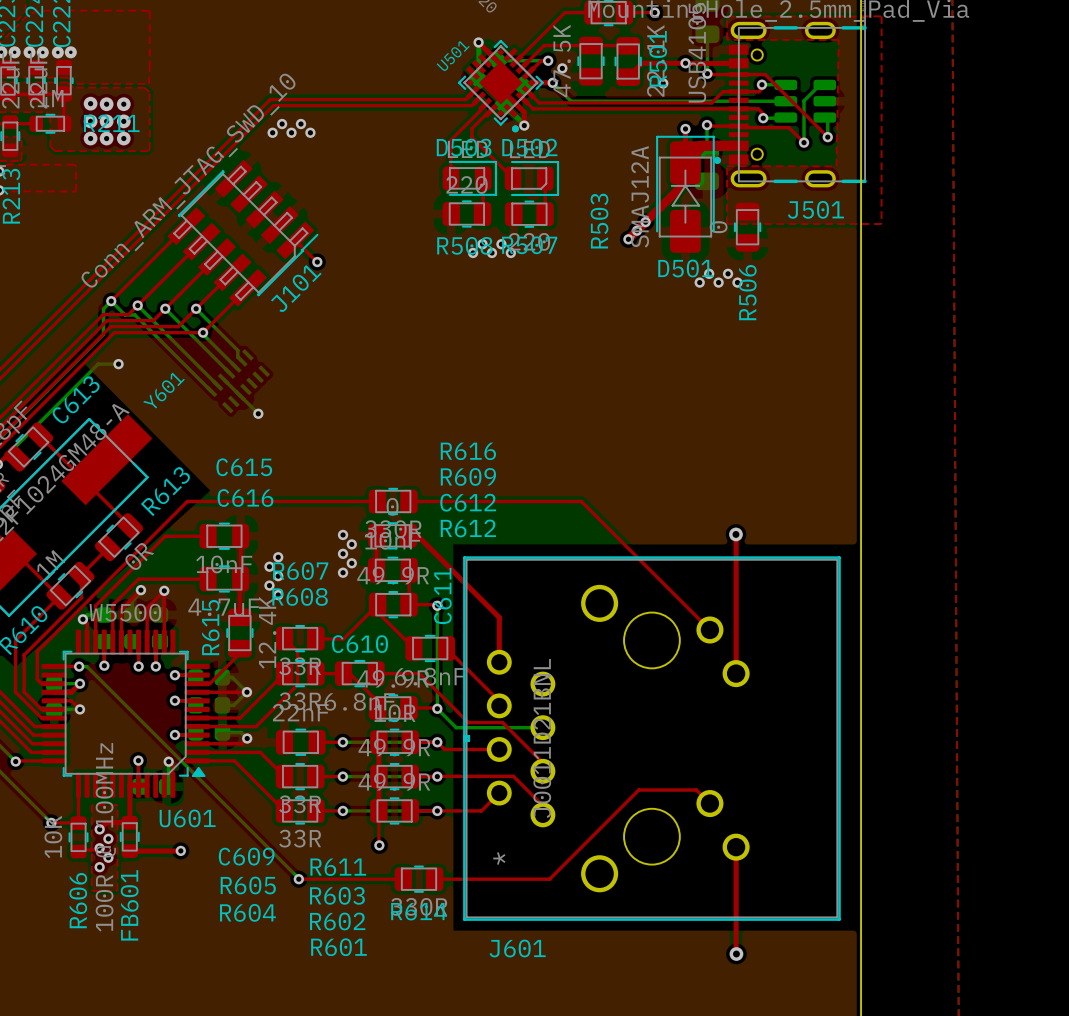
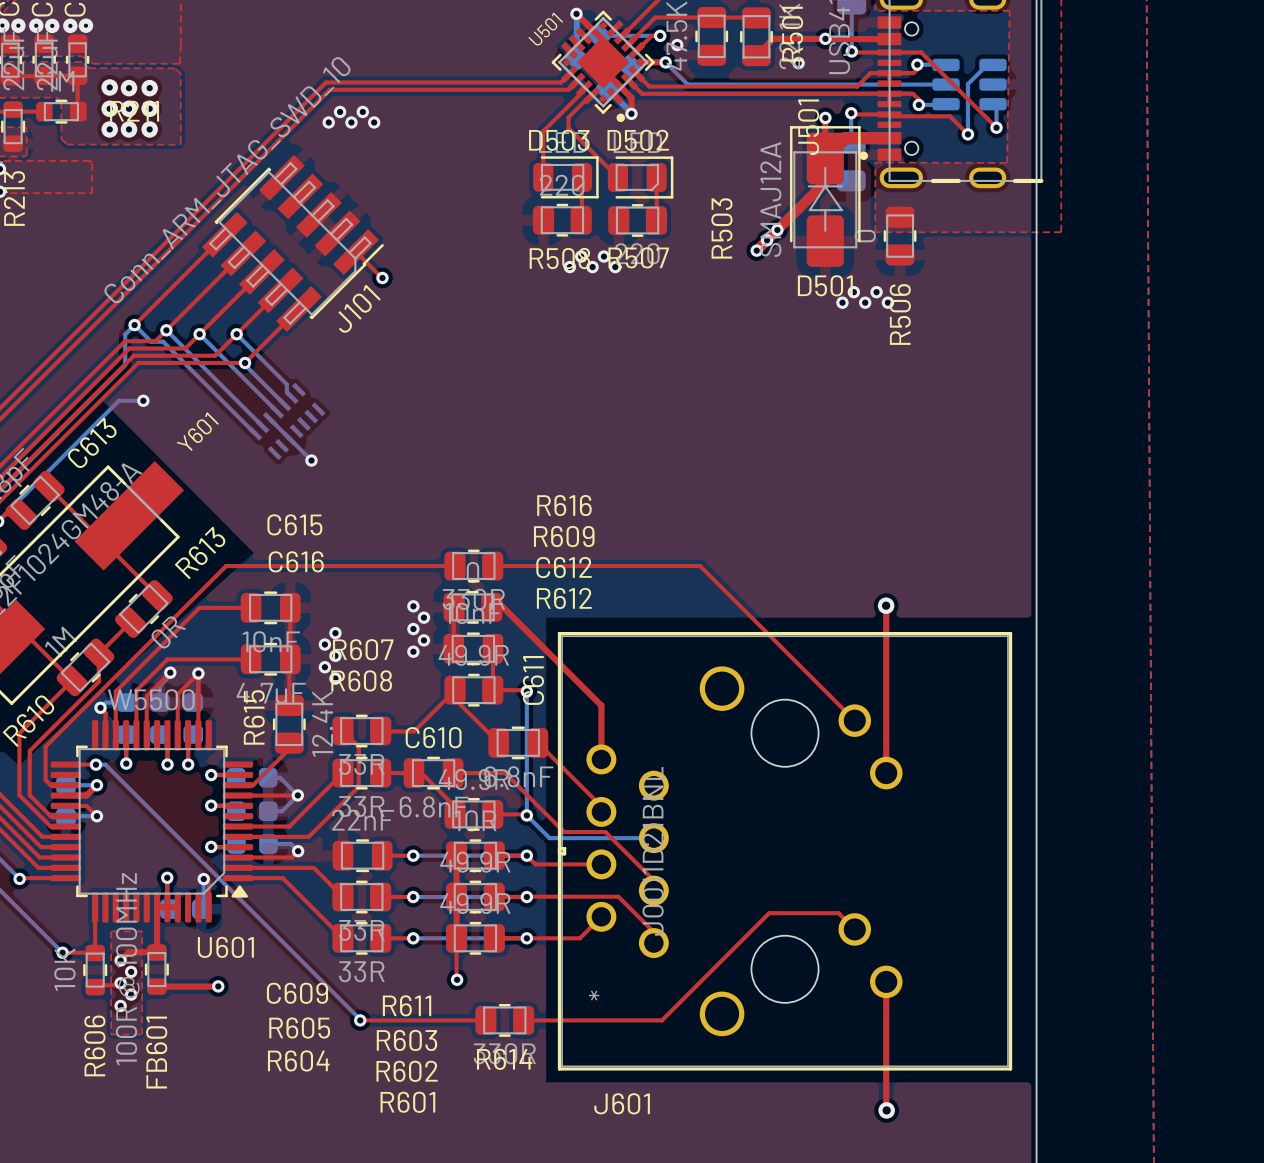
J501 name rotation: 0° (815, 209) -> 90° counterclockwise (808, 127)
J501 name position: J501 (815, 209) -> J501 (808, 127)

